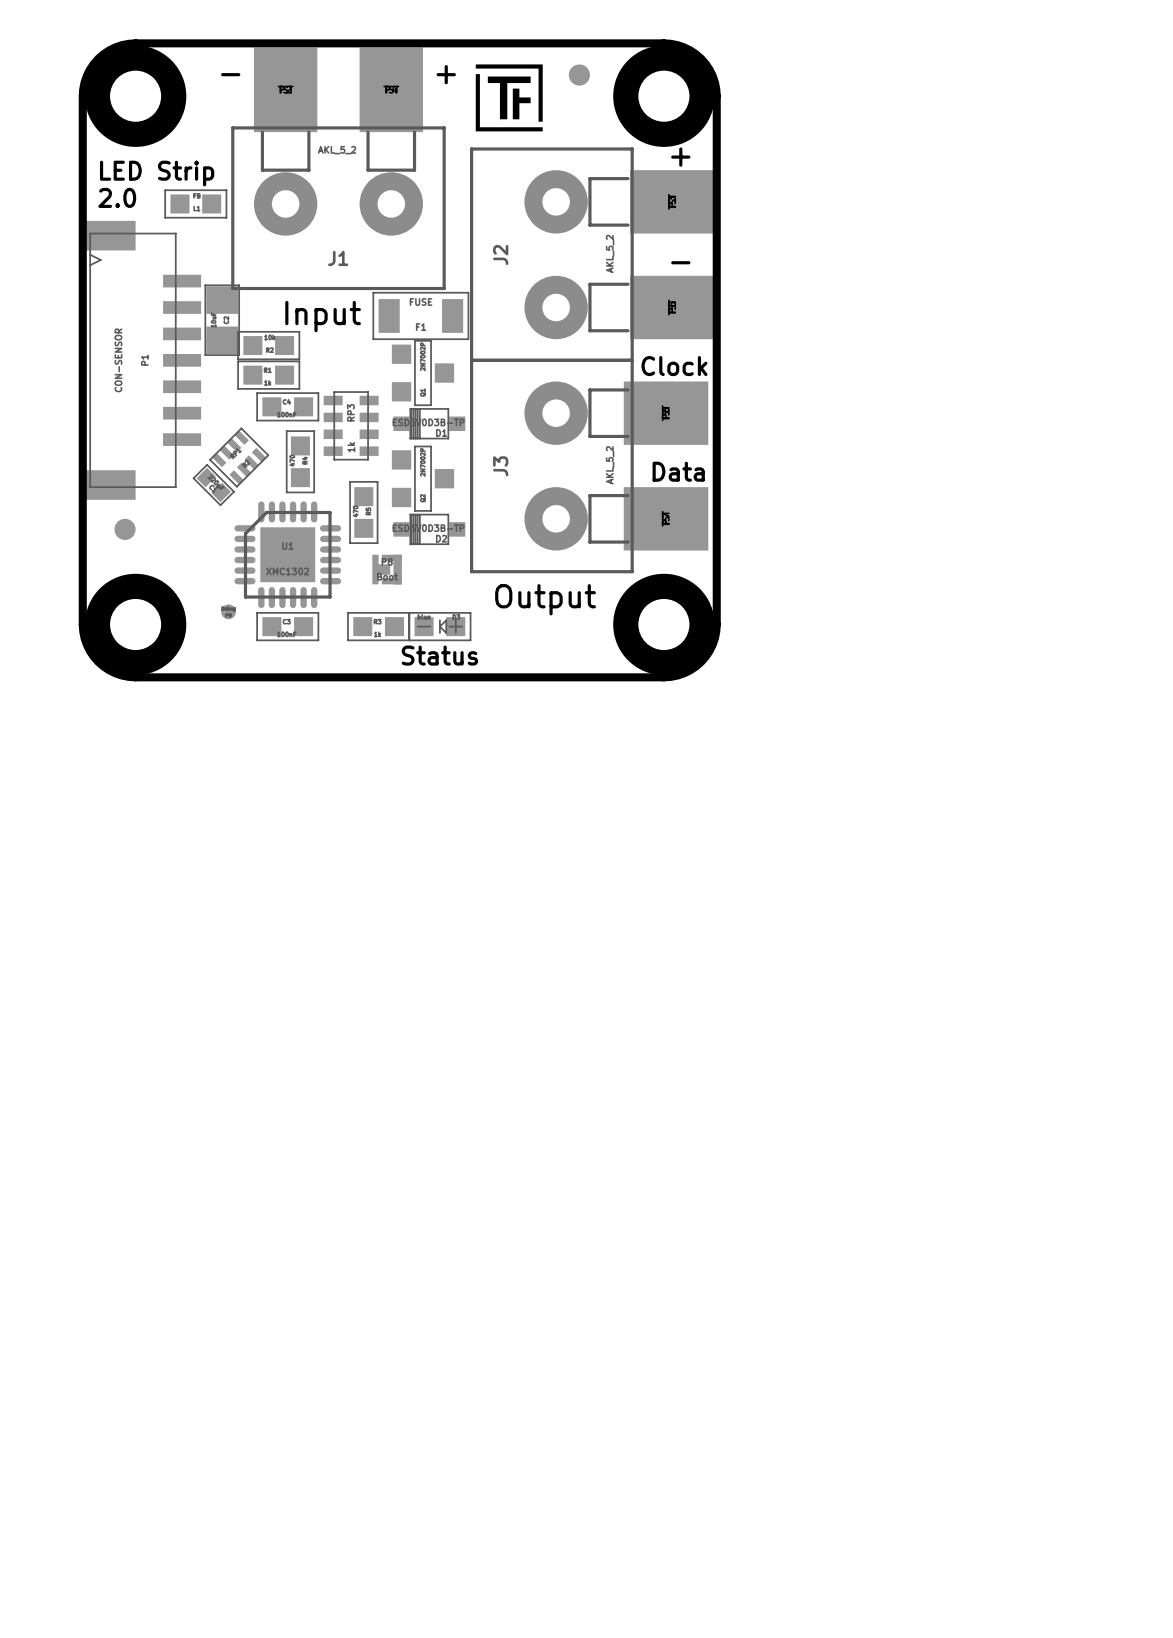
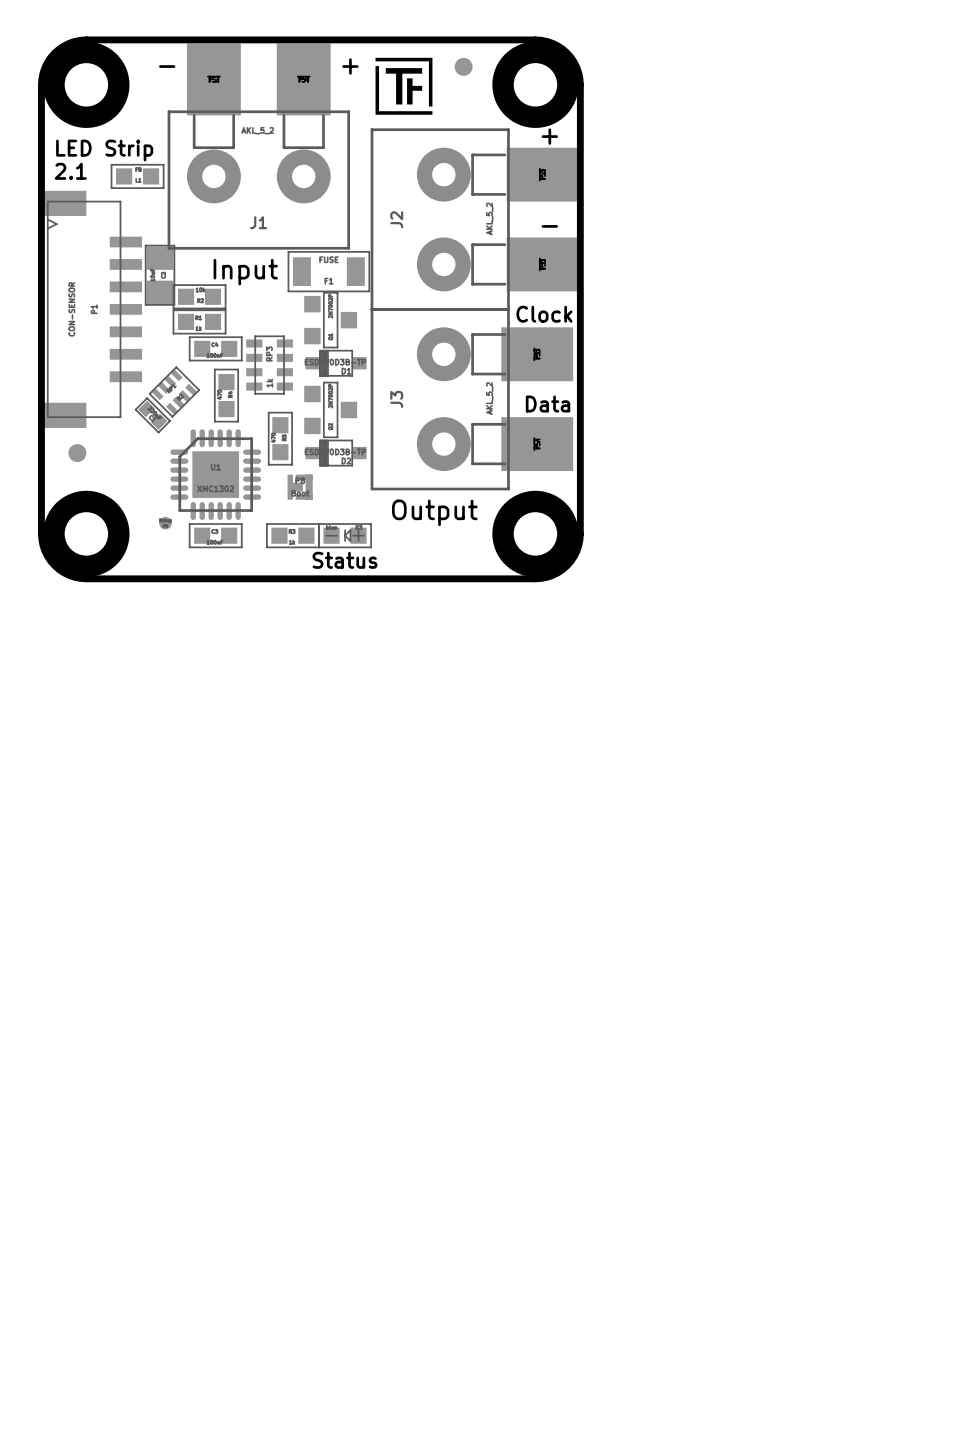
text: 2.0 (117, 197) -> 2.1 (70, 171)

